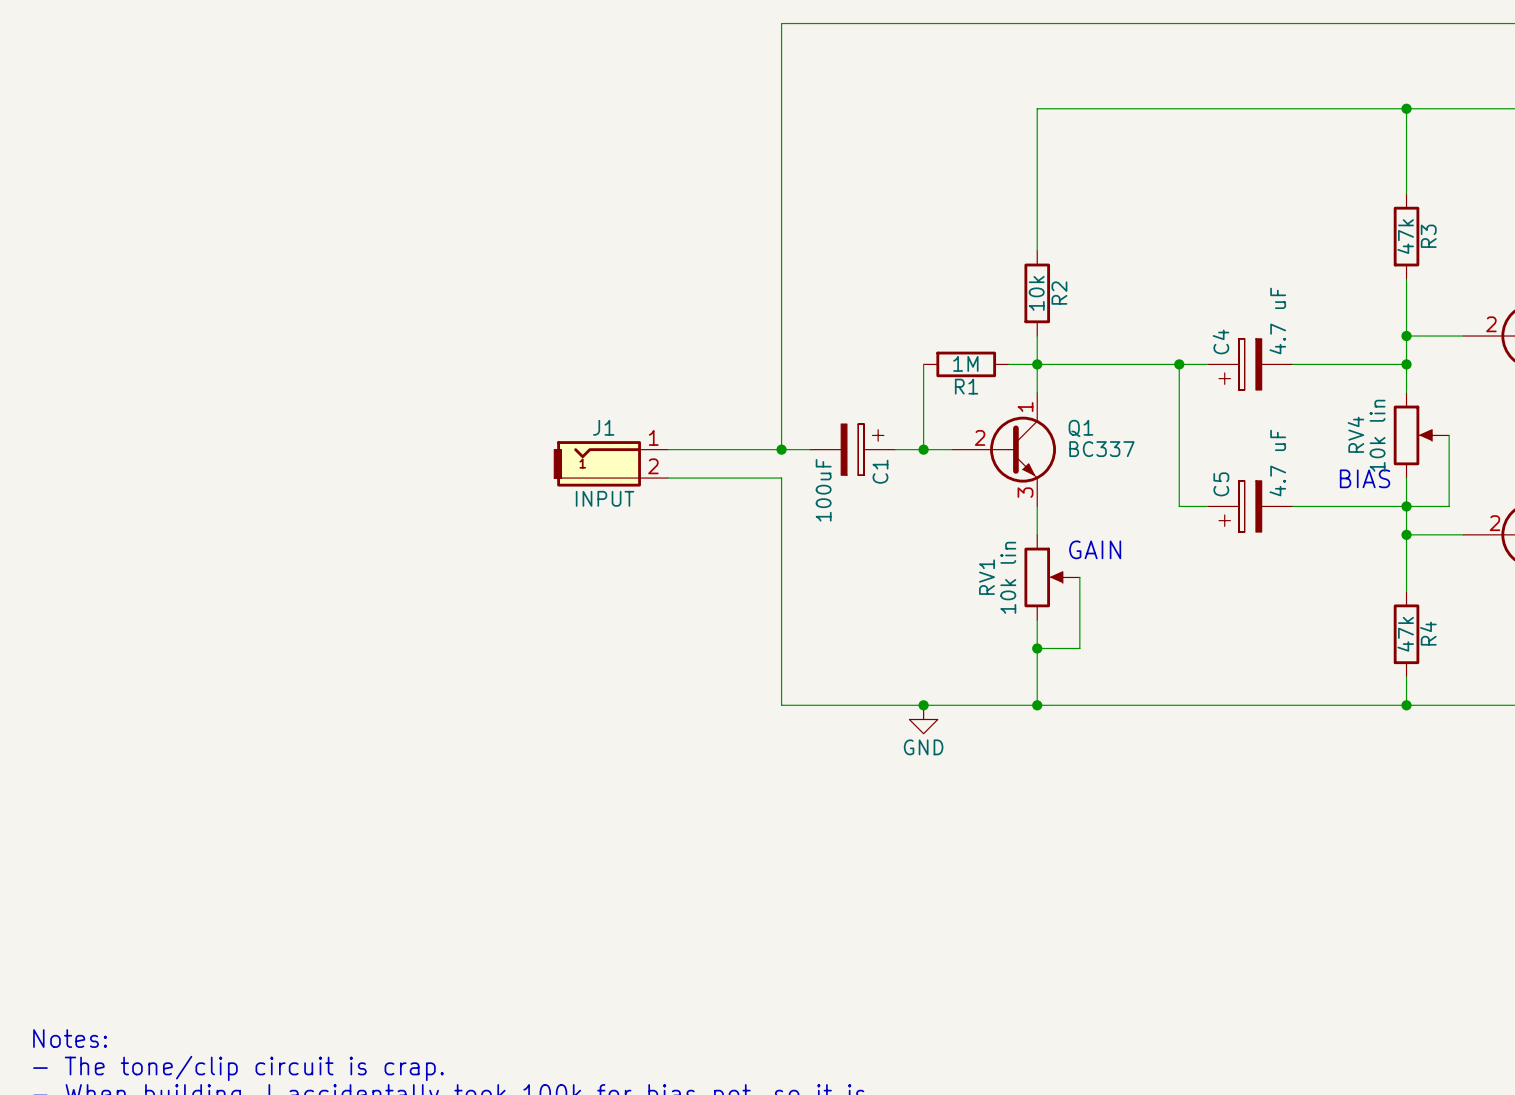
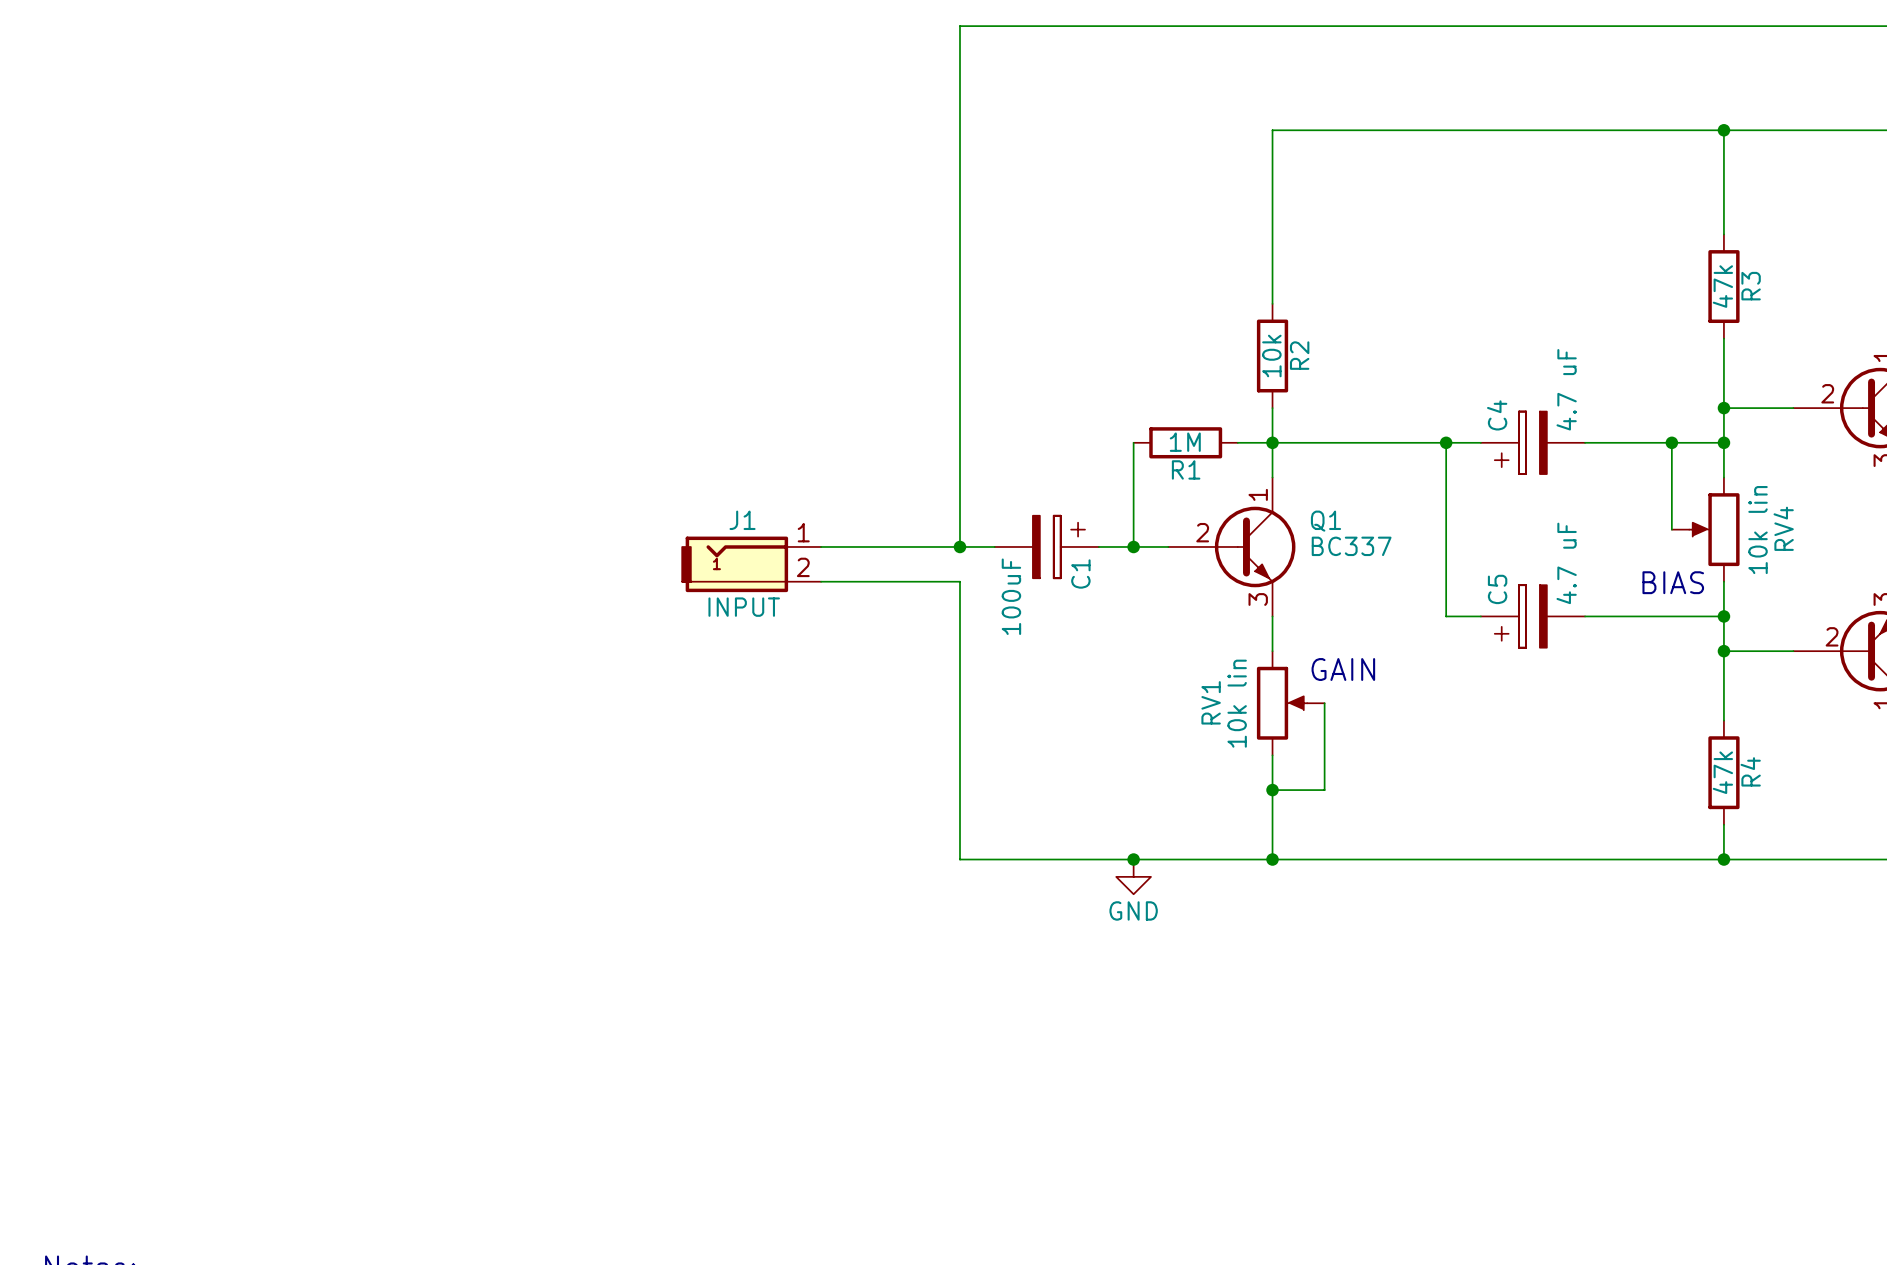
wire: none -> (1671, 442) (1671, 529)
junction: none -> (1671, 442)
RV4 flip: as is (1414, 435) -> left-right (1714, 529)
wire: (1449, 435) (1449, 506) (1406, 506) -> none

